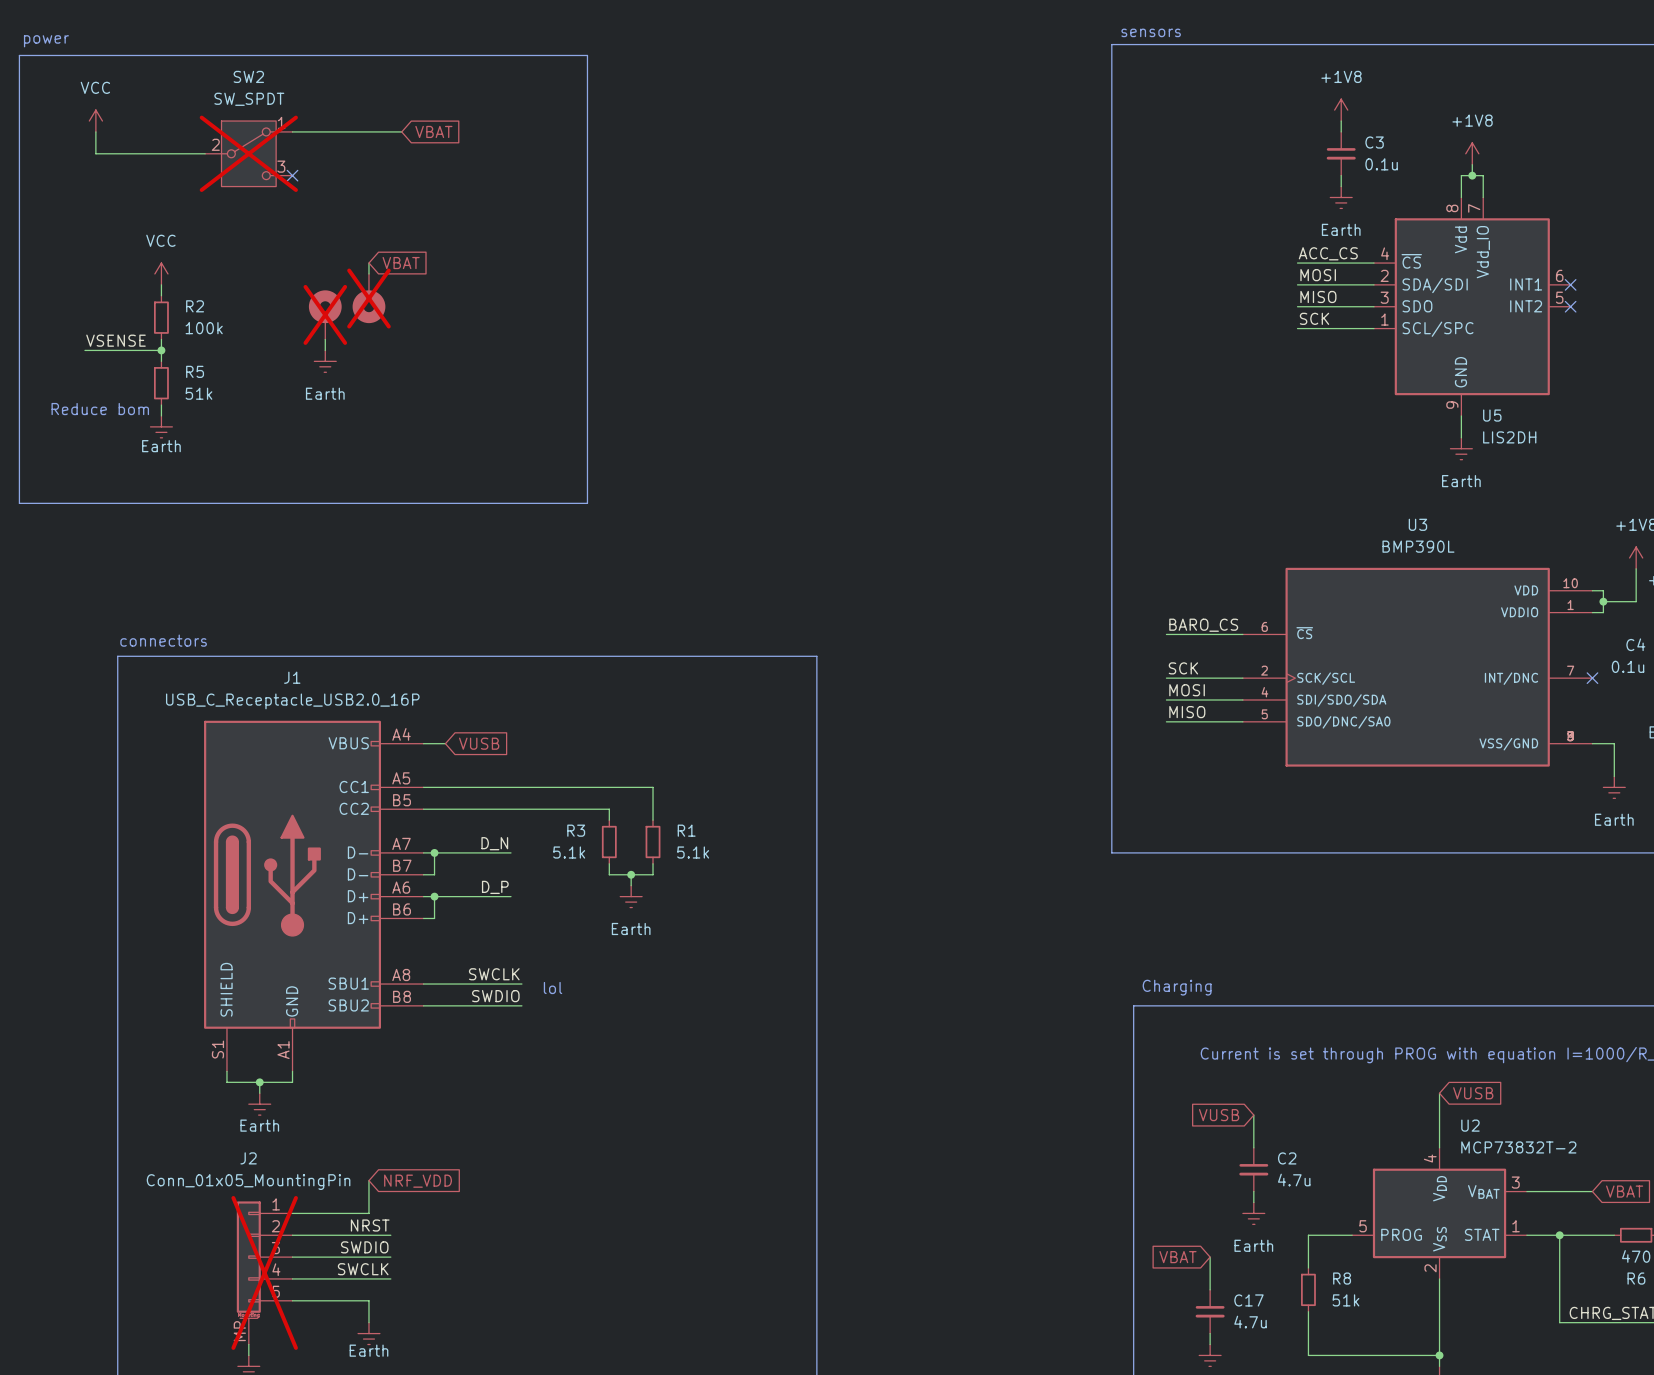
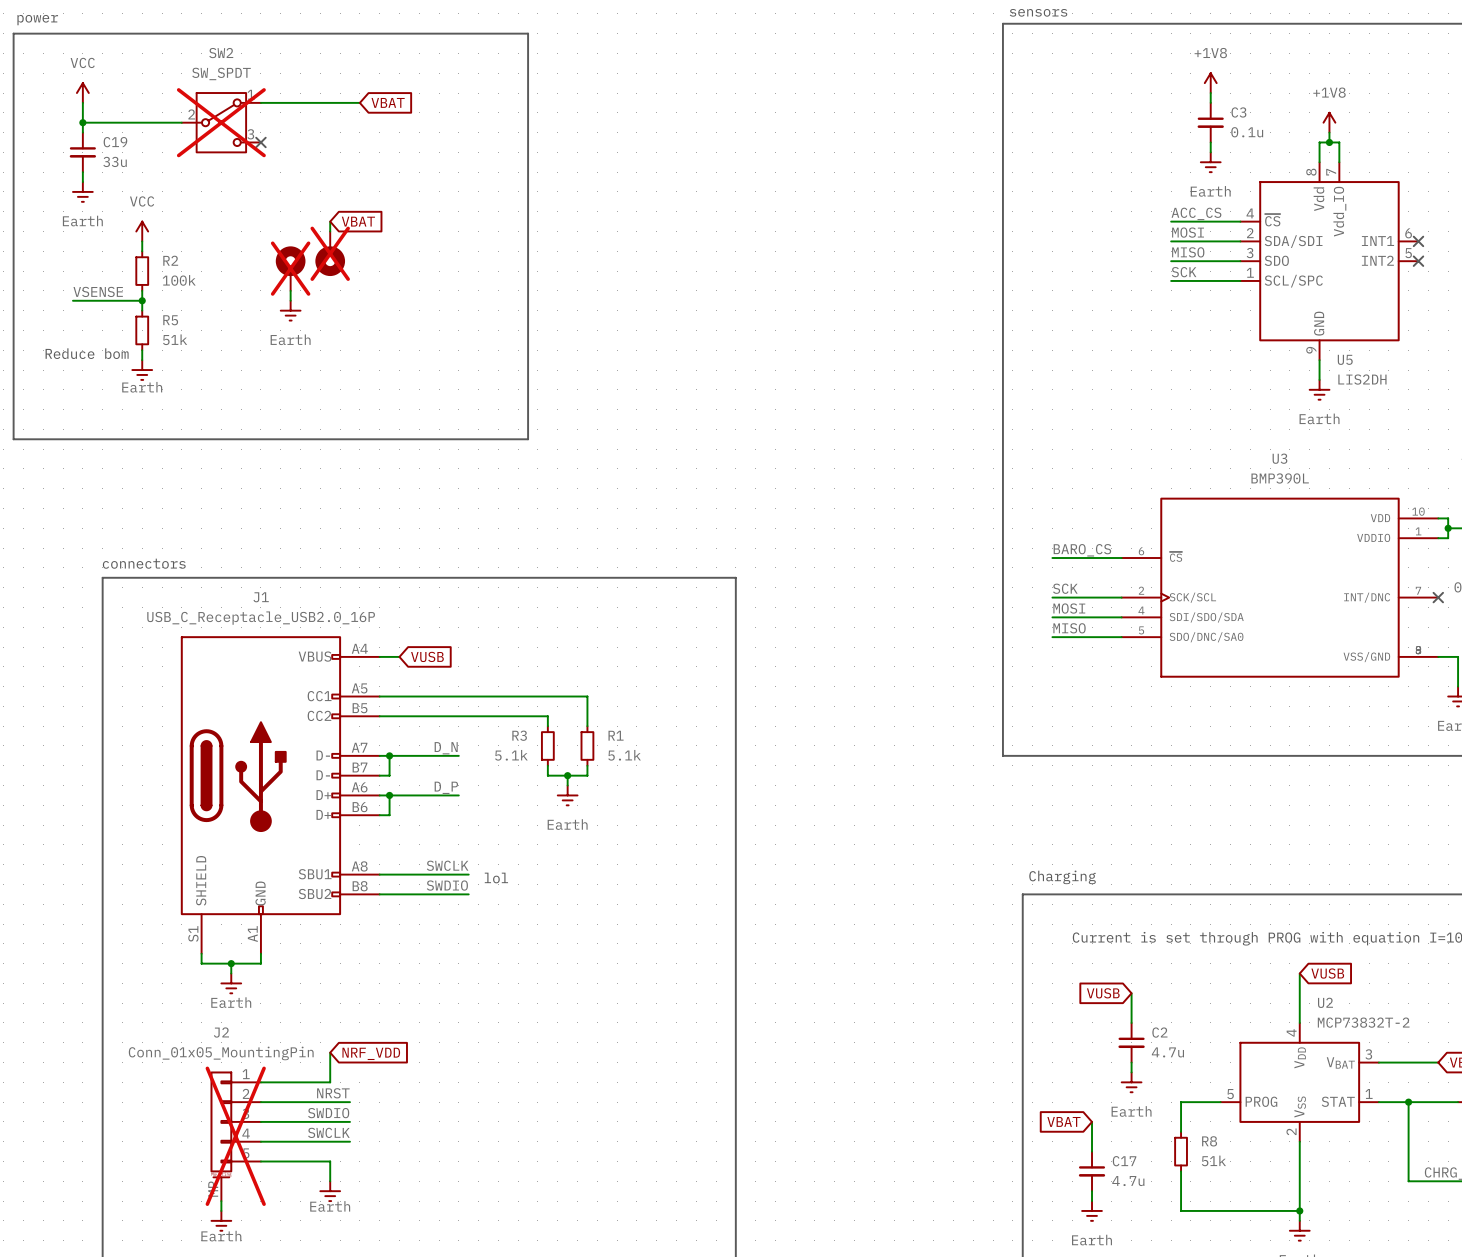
wire: none -> (82, 122) (82, 132)
junction: none -> (82, 122)
C19: none -> 33u (82, 152)
wire: none -> (82, 172) (82, 182)
power symbol: none -> Earth (82, 191)

